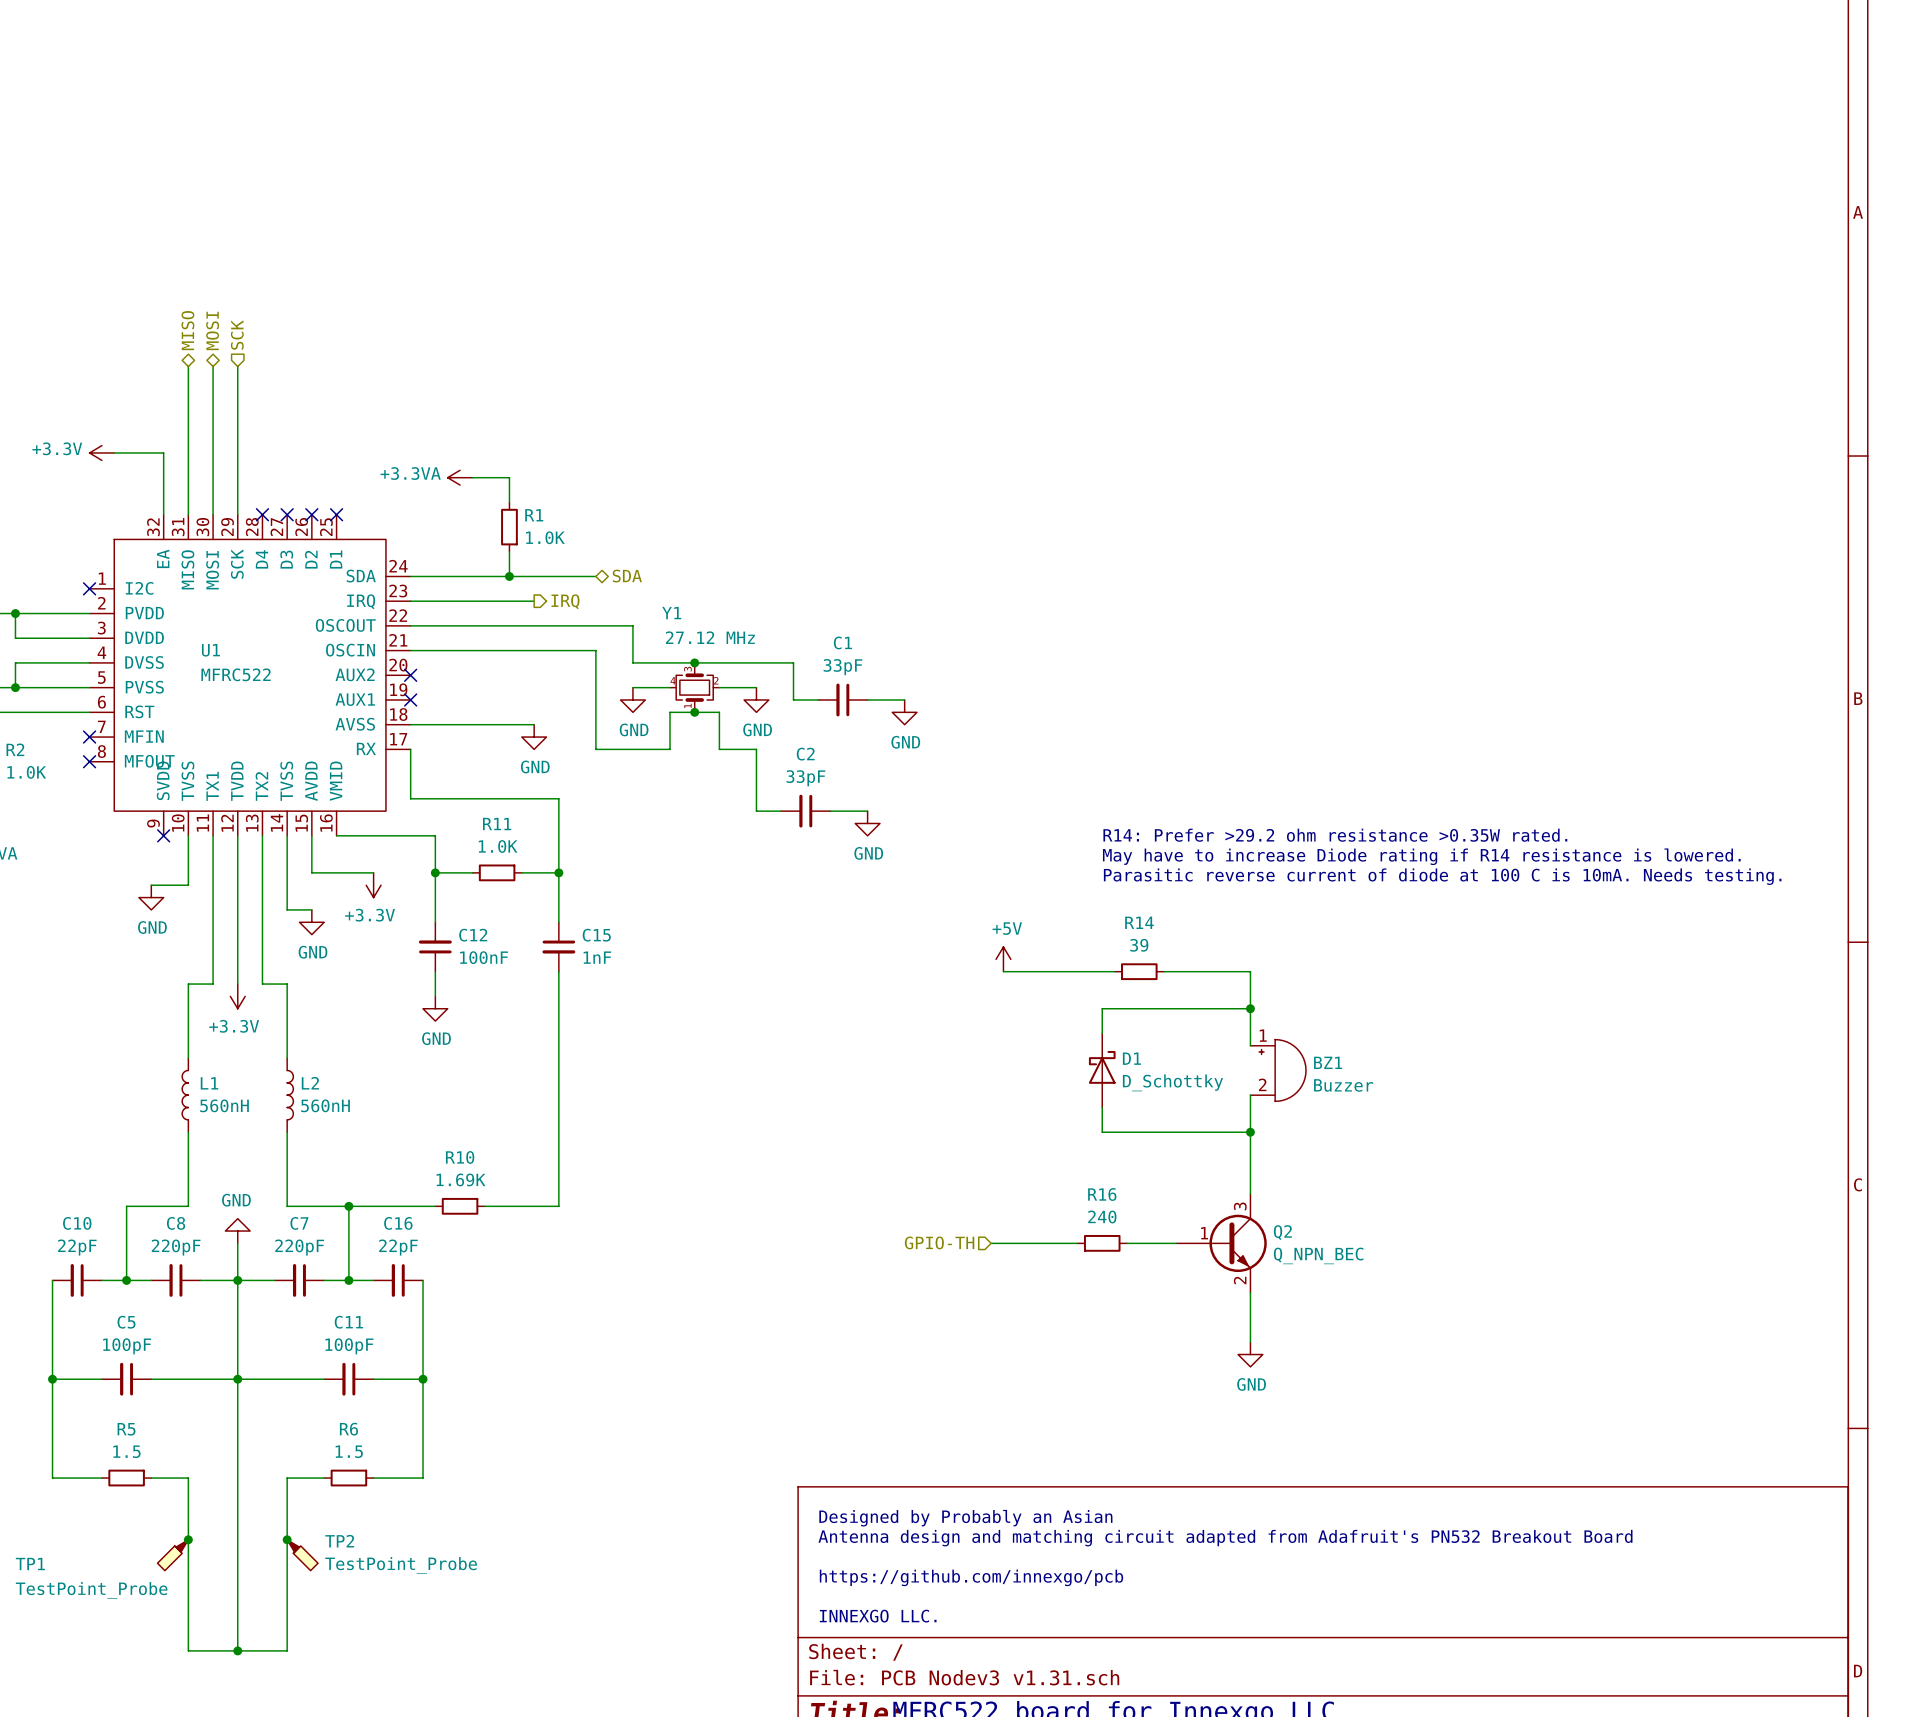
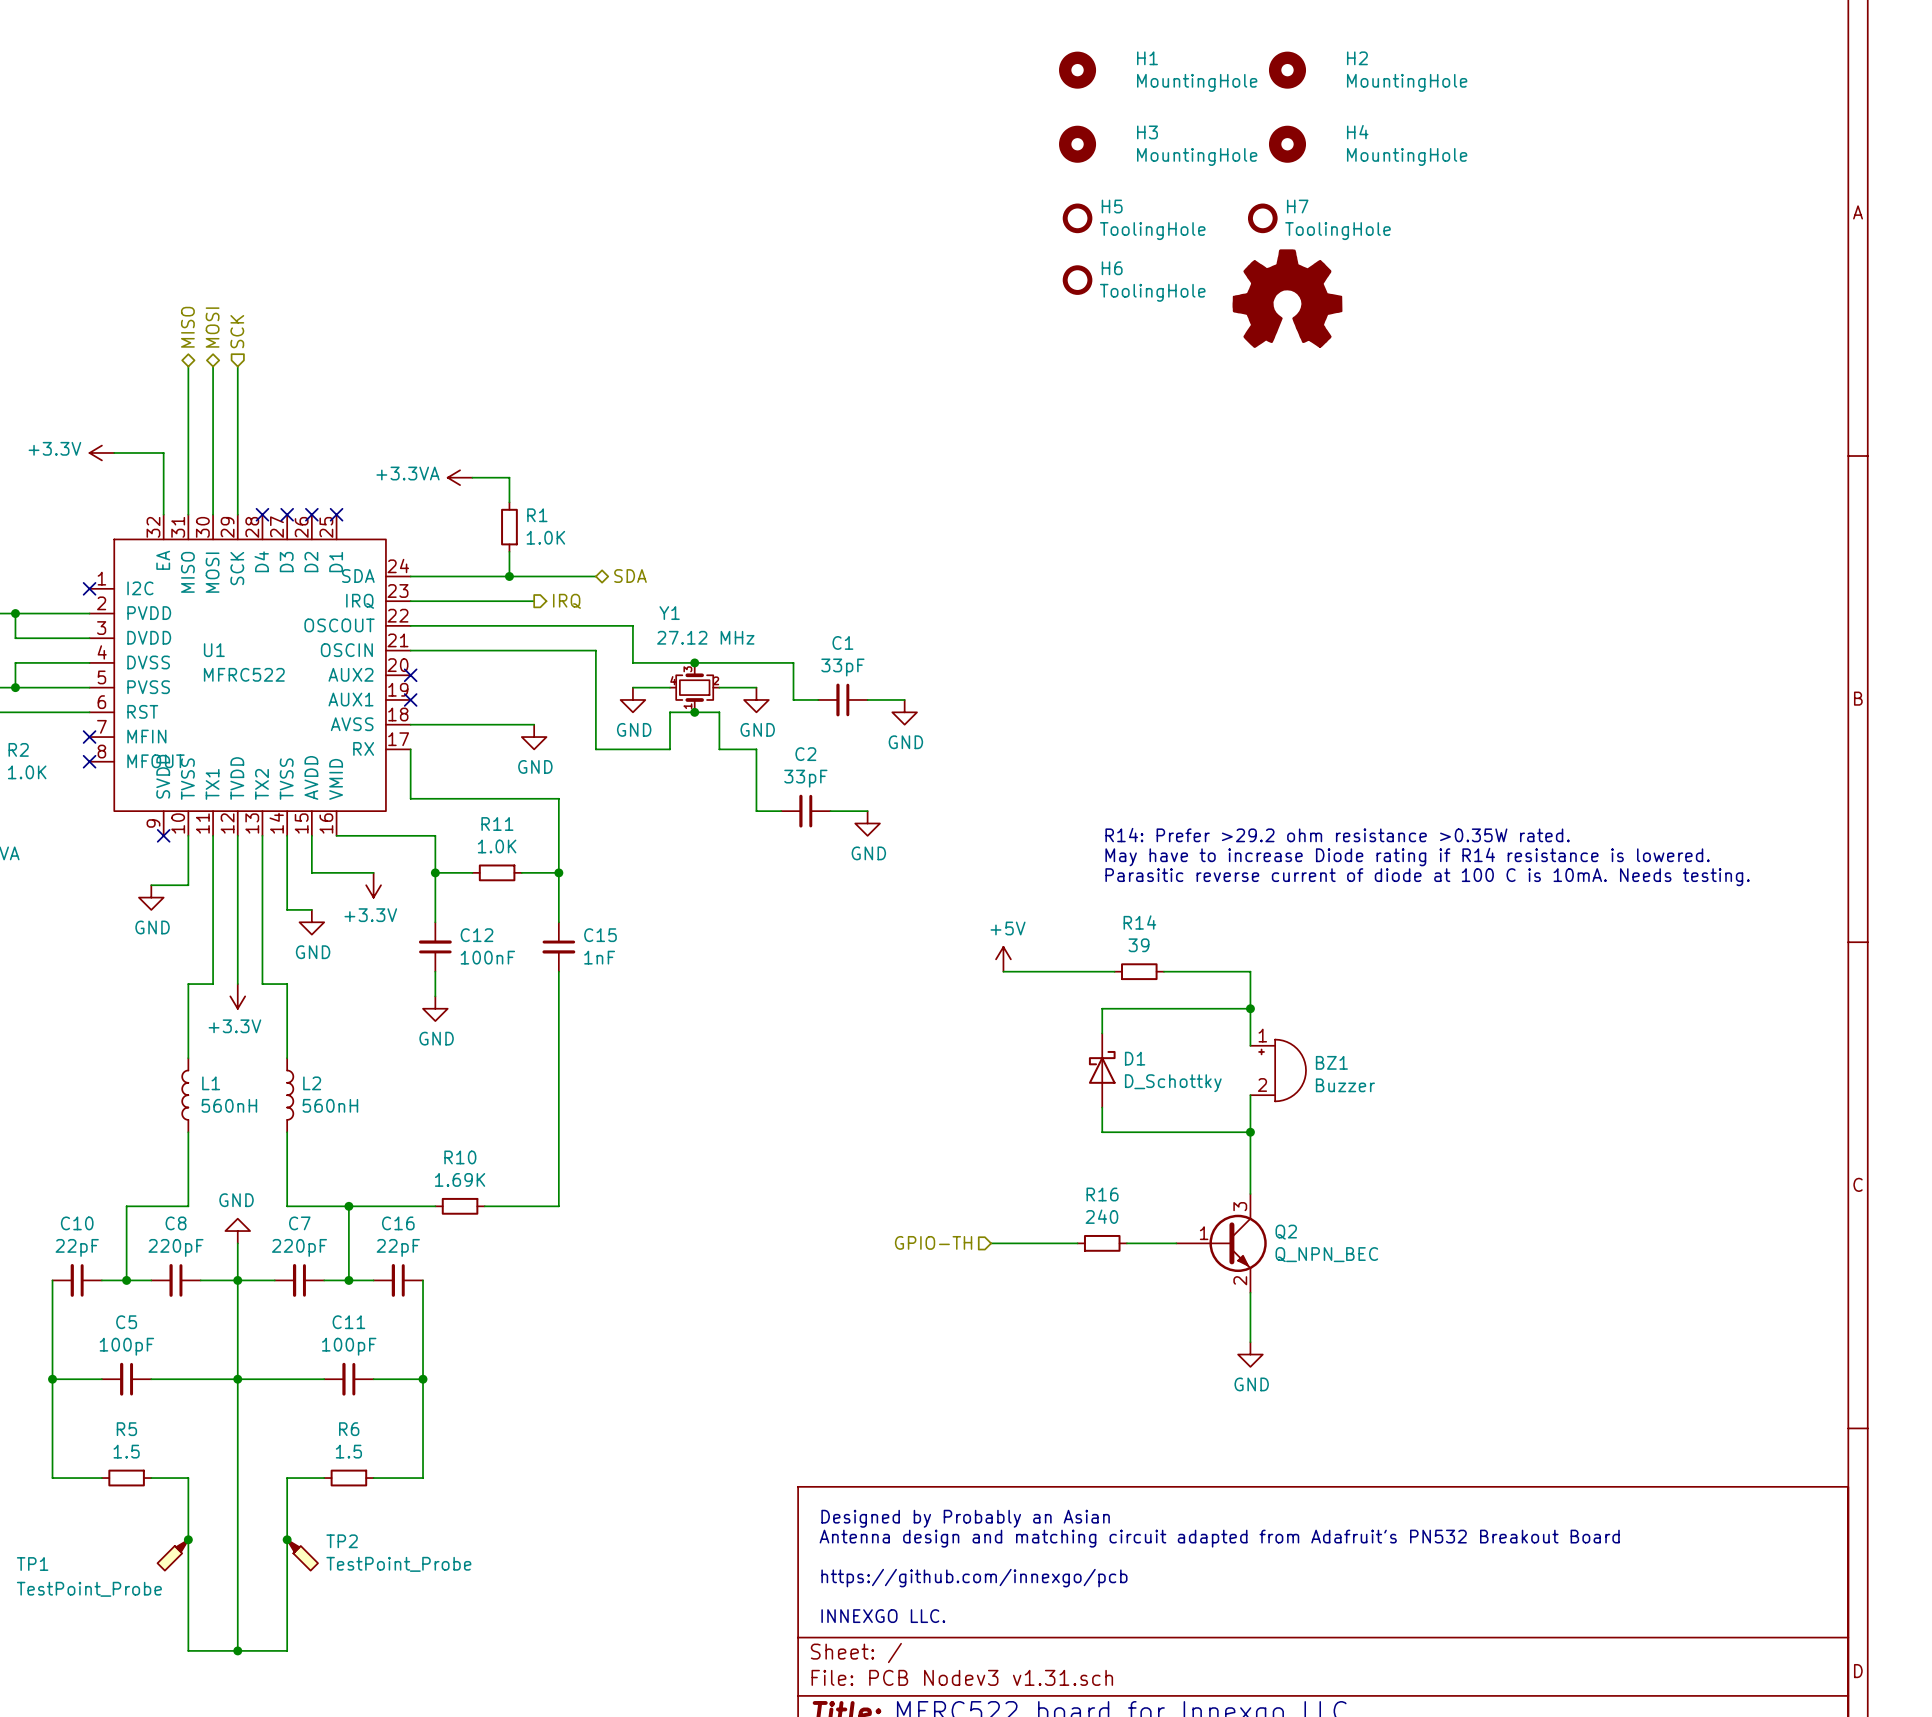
H1: none -> MountingHole (1077, 70)
H2: none -> MountingHole (1287, 70)
H3: none -> MountingHole (1077, 144)
H4: none -> MountingHole (1287, 144)
H5: none -> ToolingHole (1077, 218)
H7: none -> ToolingHole (1262, 218)
H6: none -> ToolingHole (1077, 280)
part: none -> (1287, 298)

